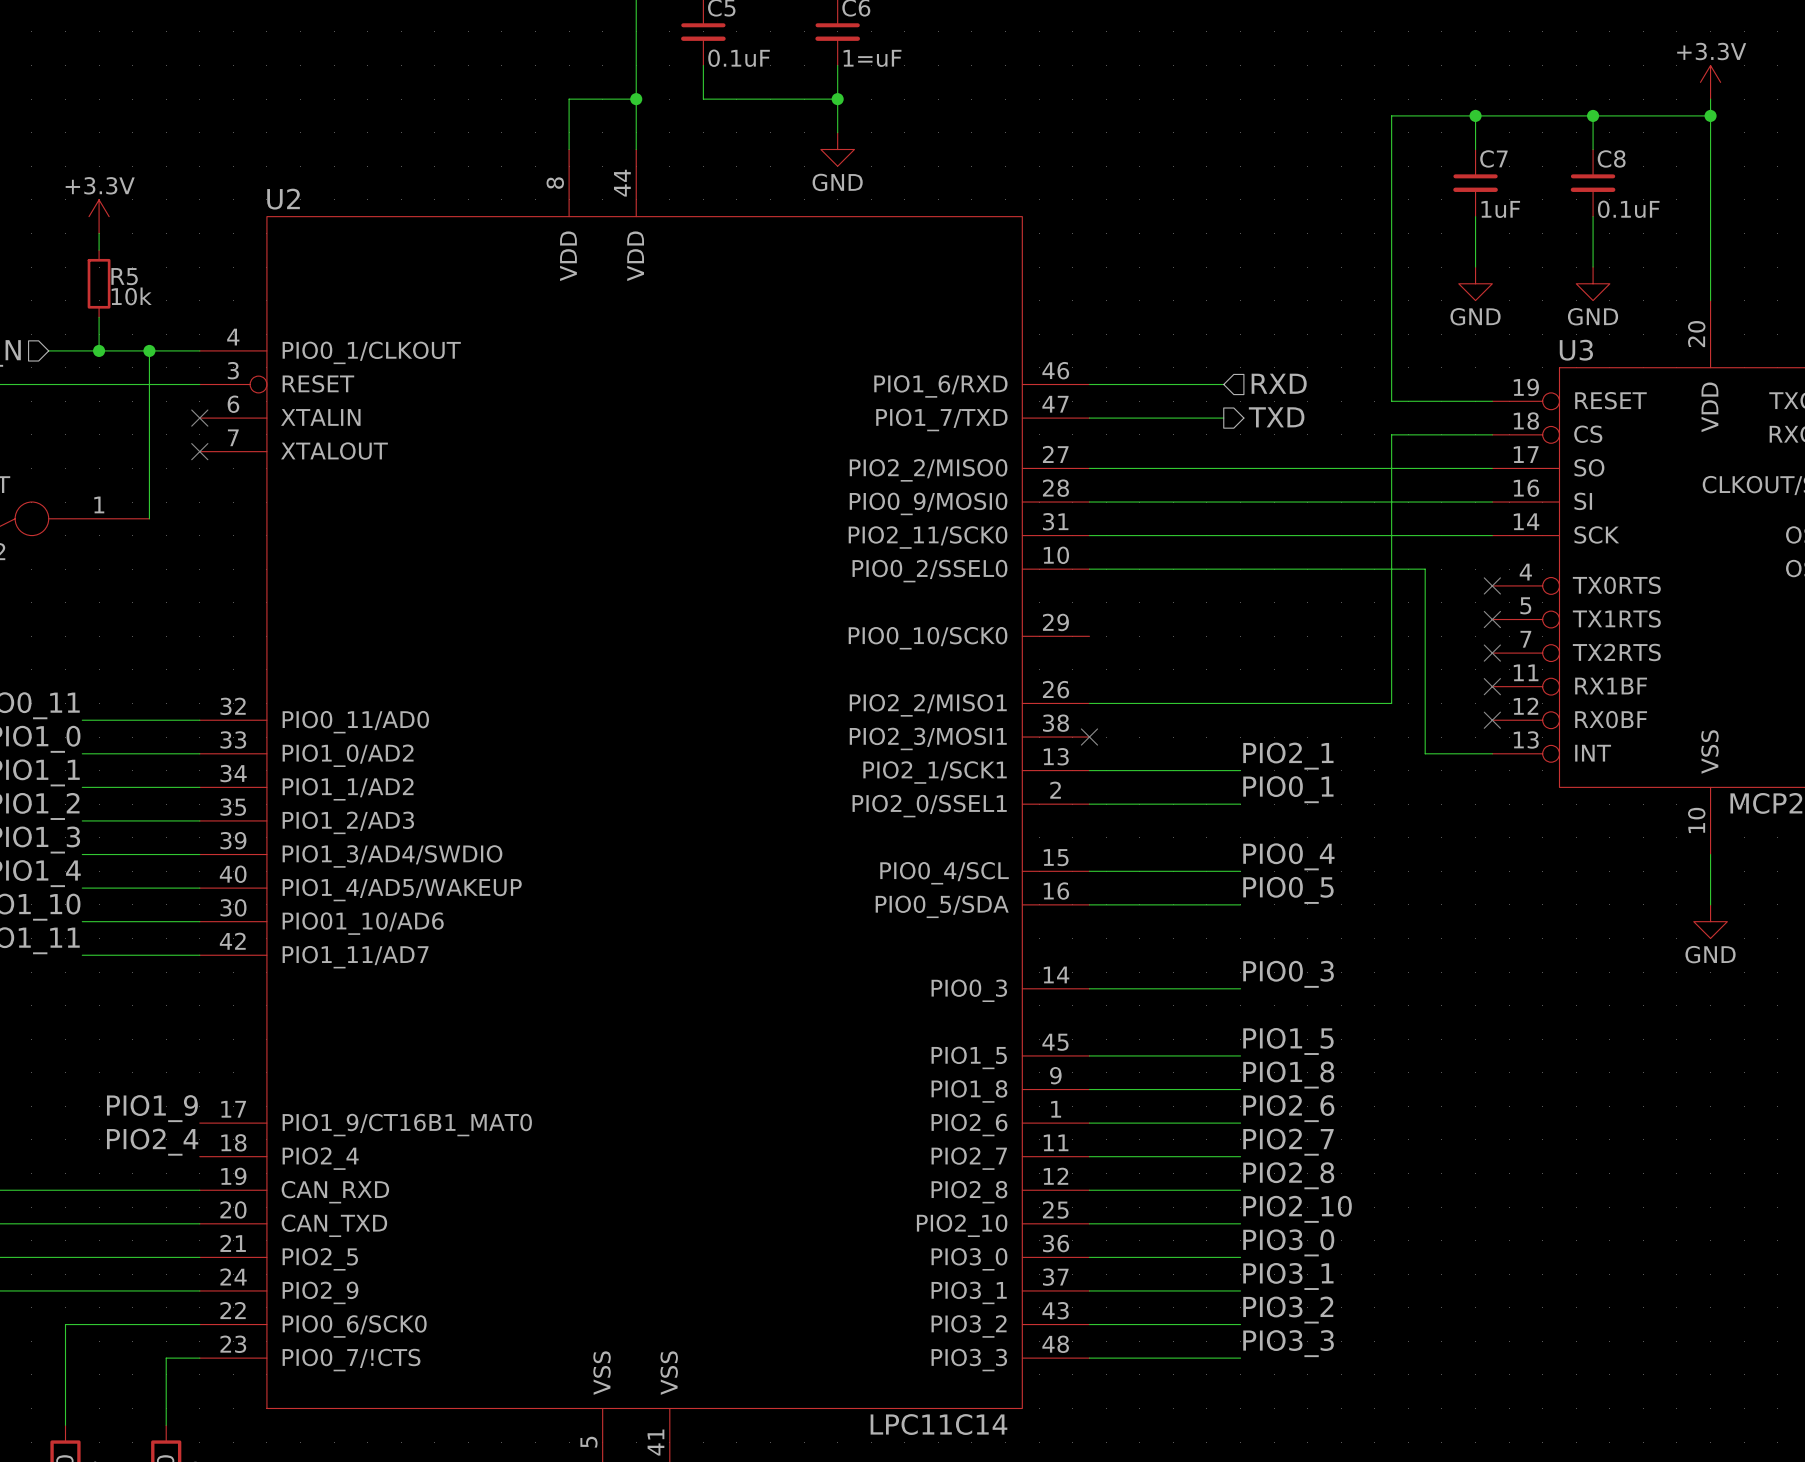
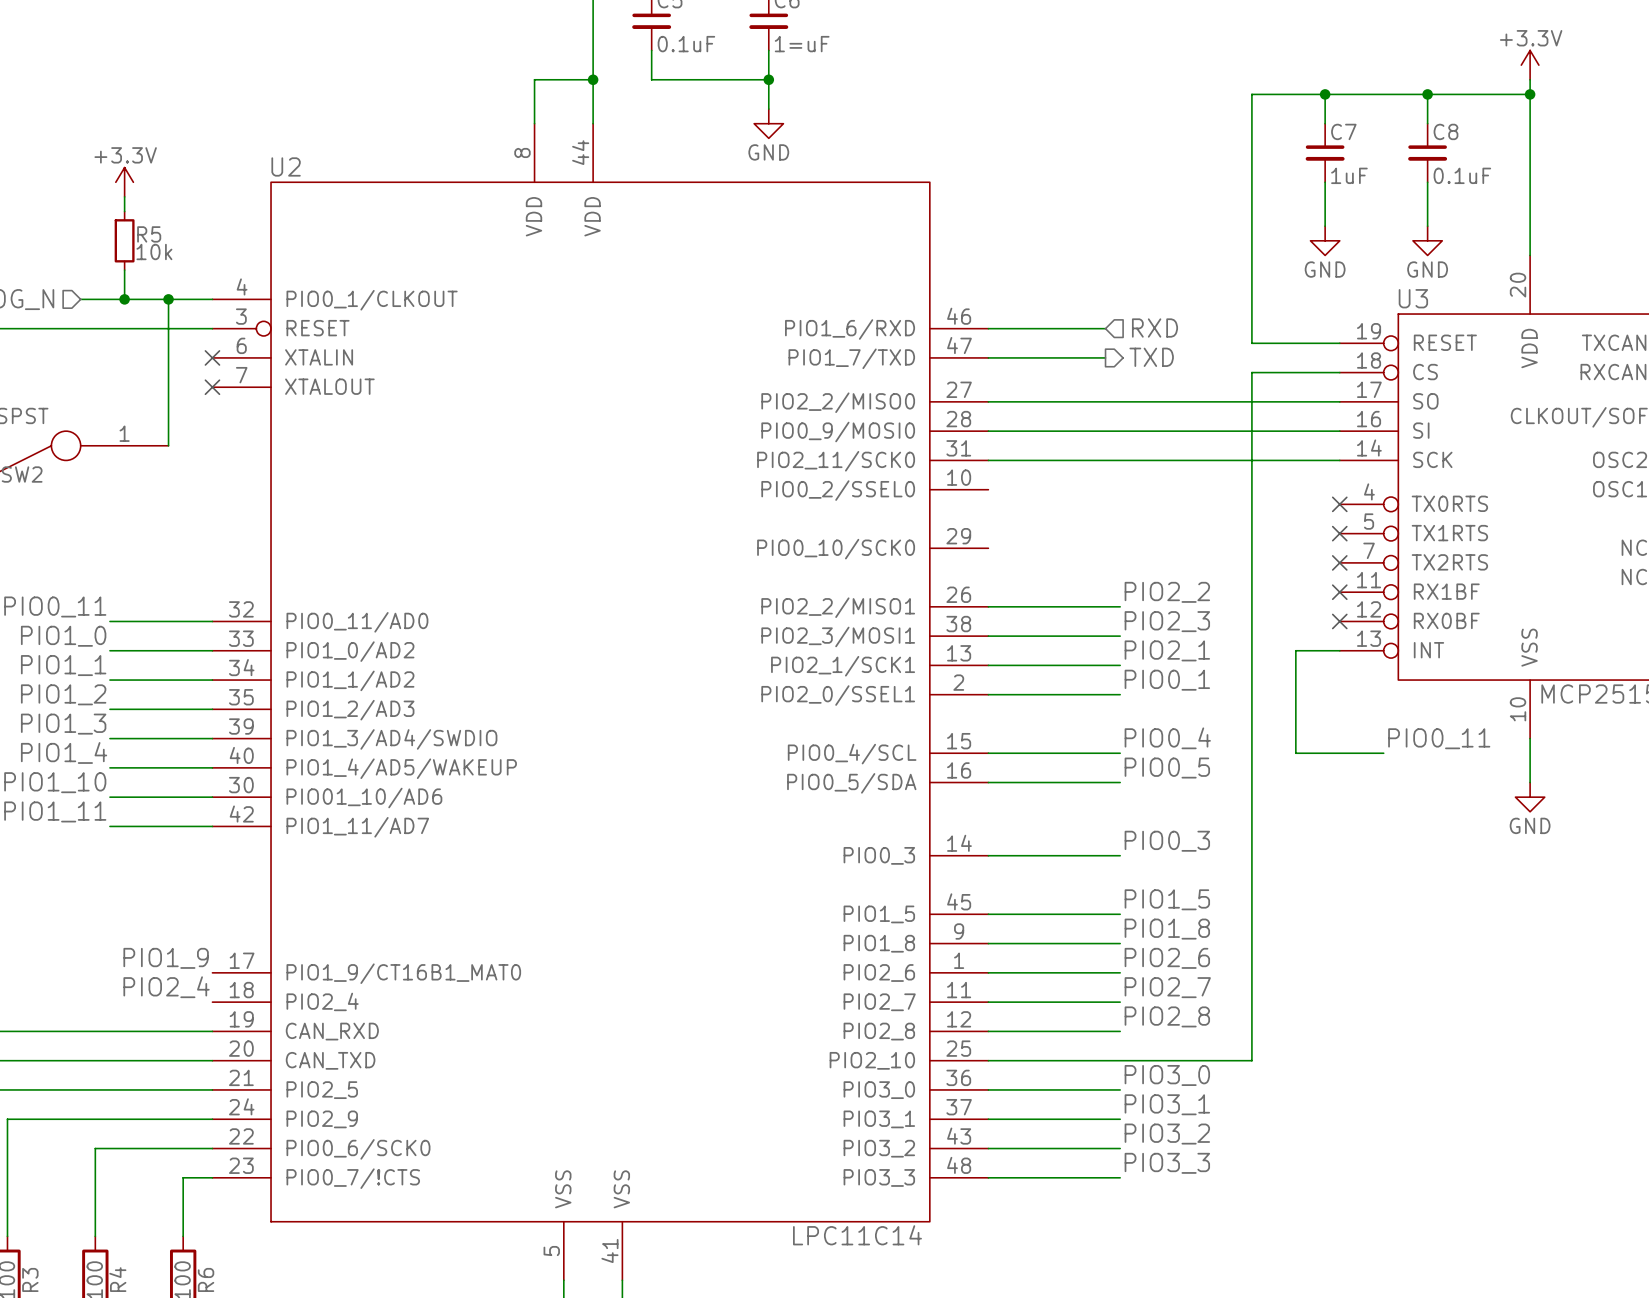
wire: (1089, 569) (1425, 569) (1425, 753) (1441, 753) -> (1383, 753) (1295, 753) (1295, 650)
label: none -> PIO2_2 (1167, 592)
wire: (1240, 703) (1391, 703) -> (1120, 1060) (1251, 1060) (1251, 606)
label: none -> PIO2_3 (1167, 621)
wire: none -> (988, 636) (1120, 636)
no-connect mark: (1089, 737) -> none
label: none -> PIO0_11 (1439, 738)
label: PIO2_10 (1297, 1209) -> none

